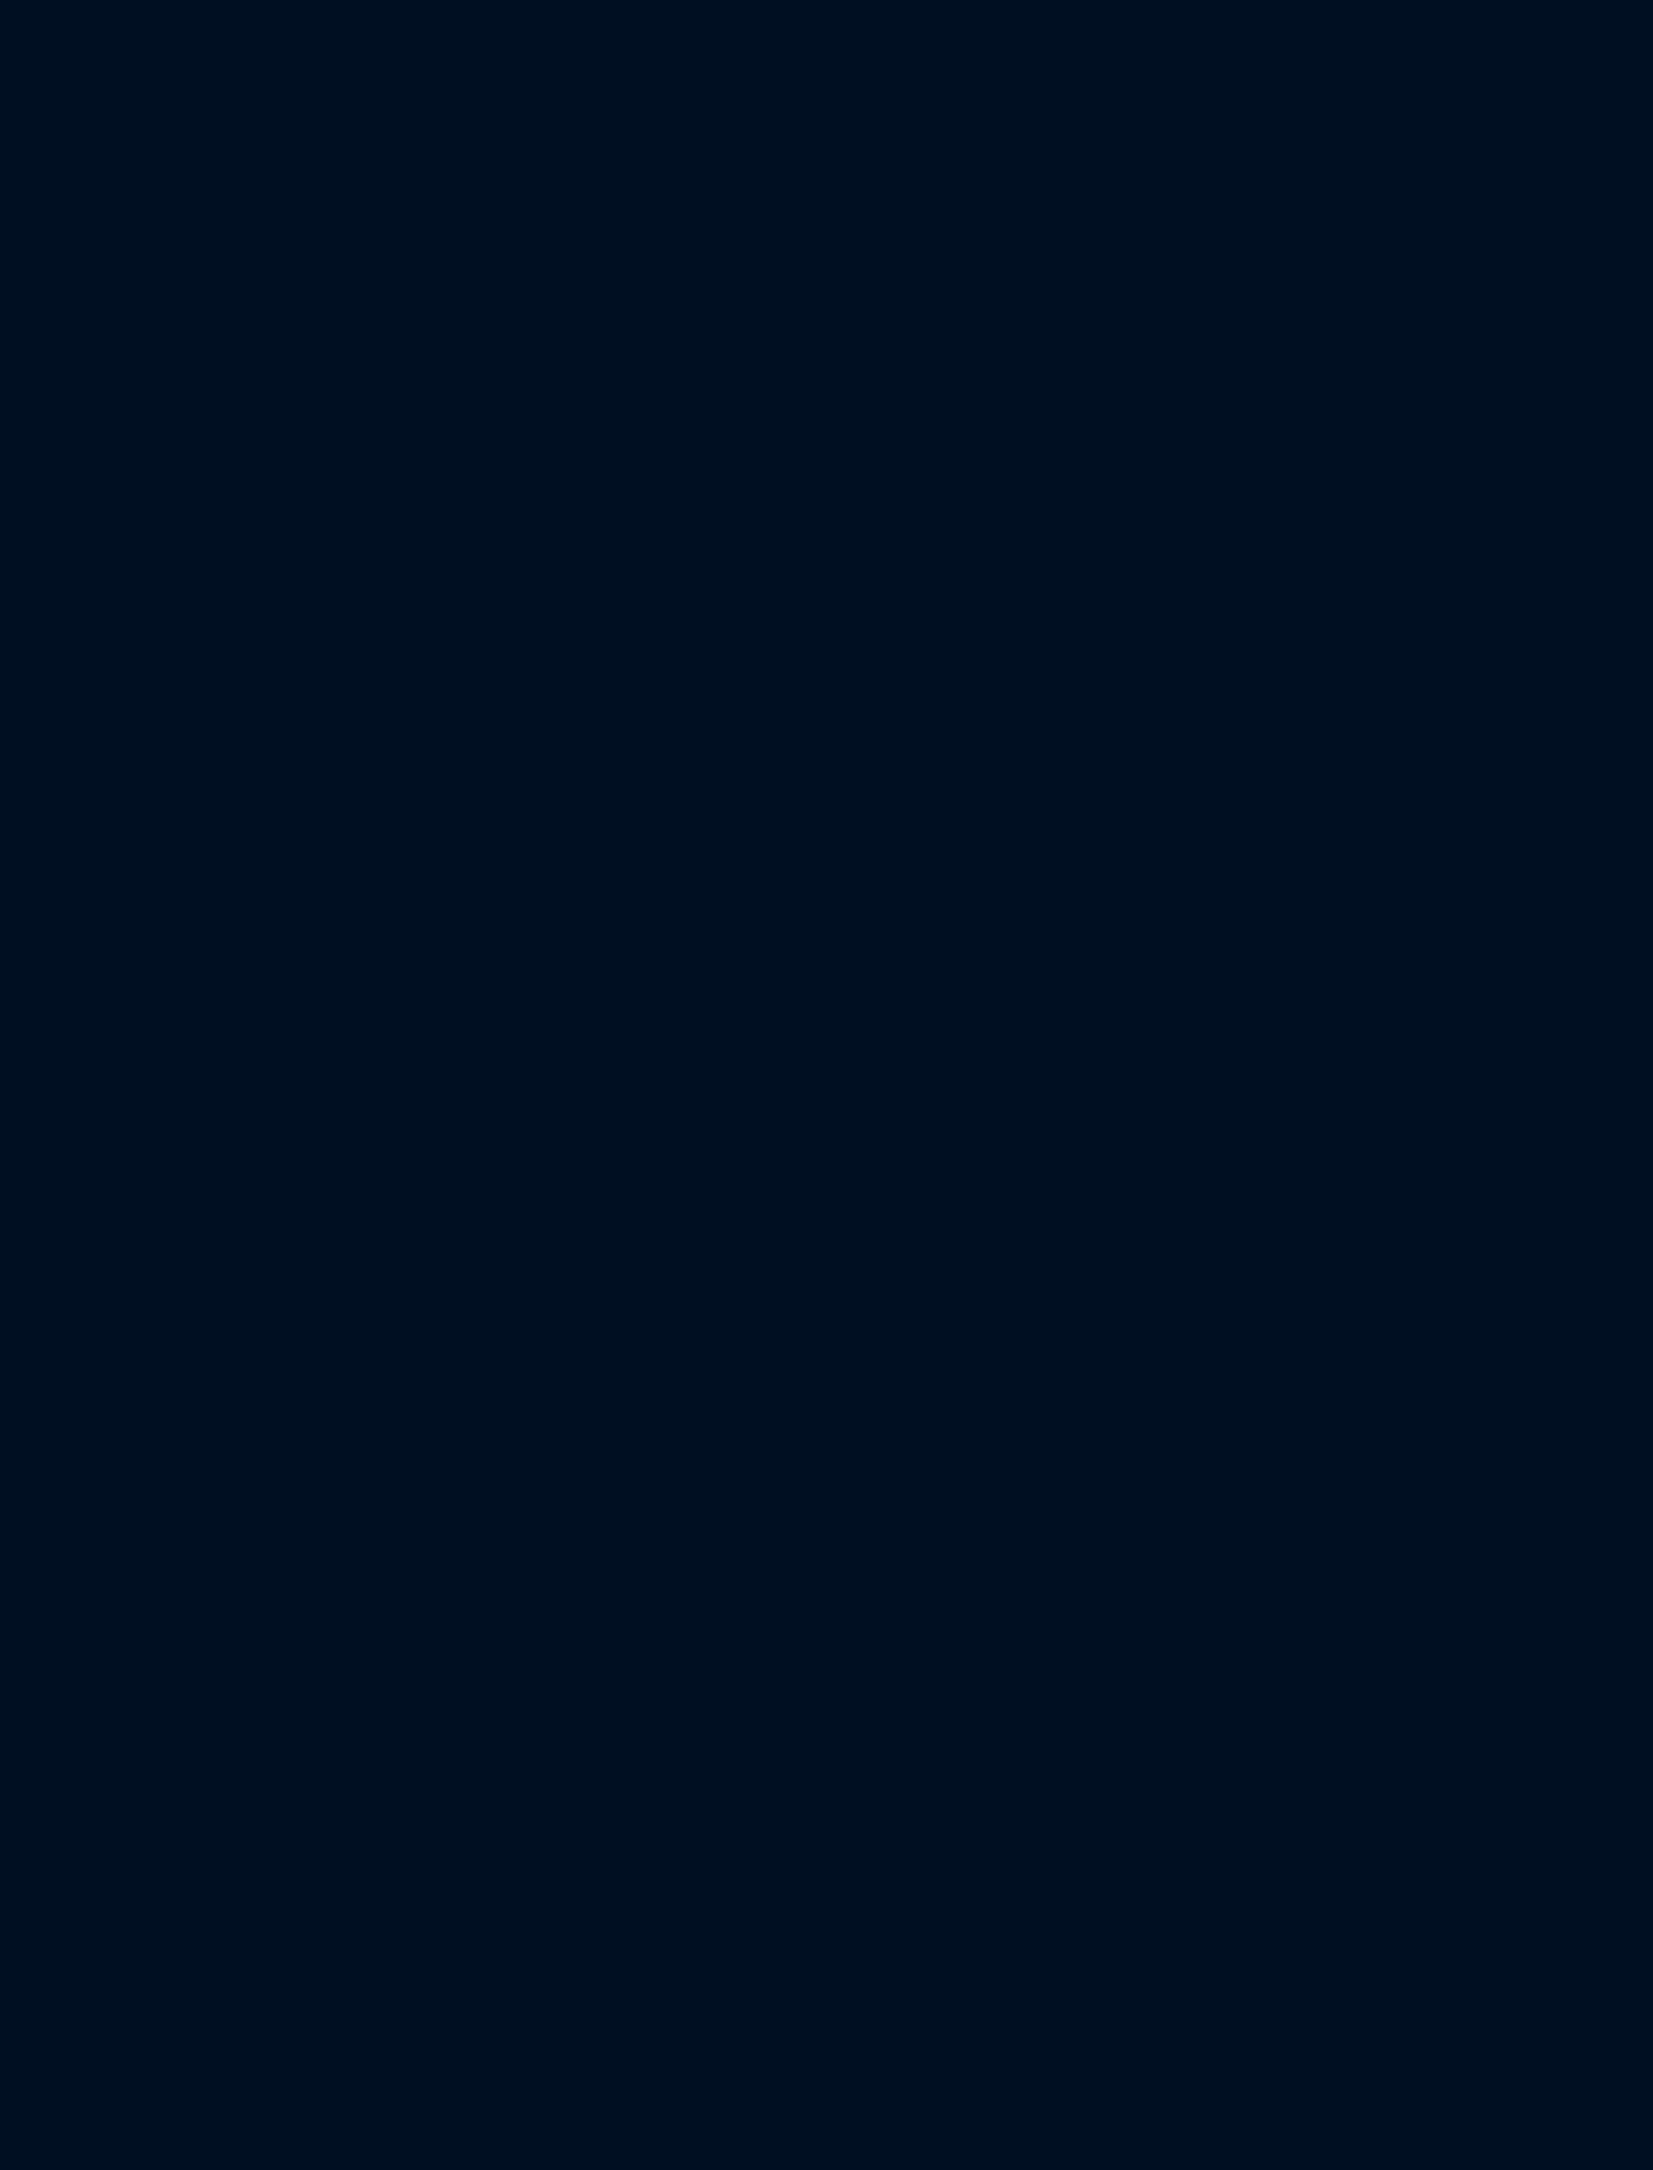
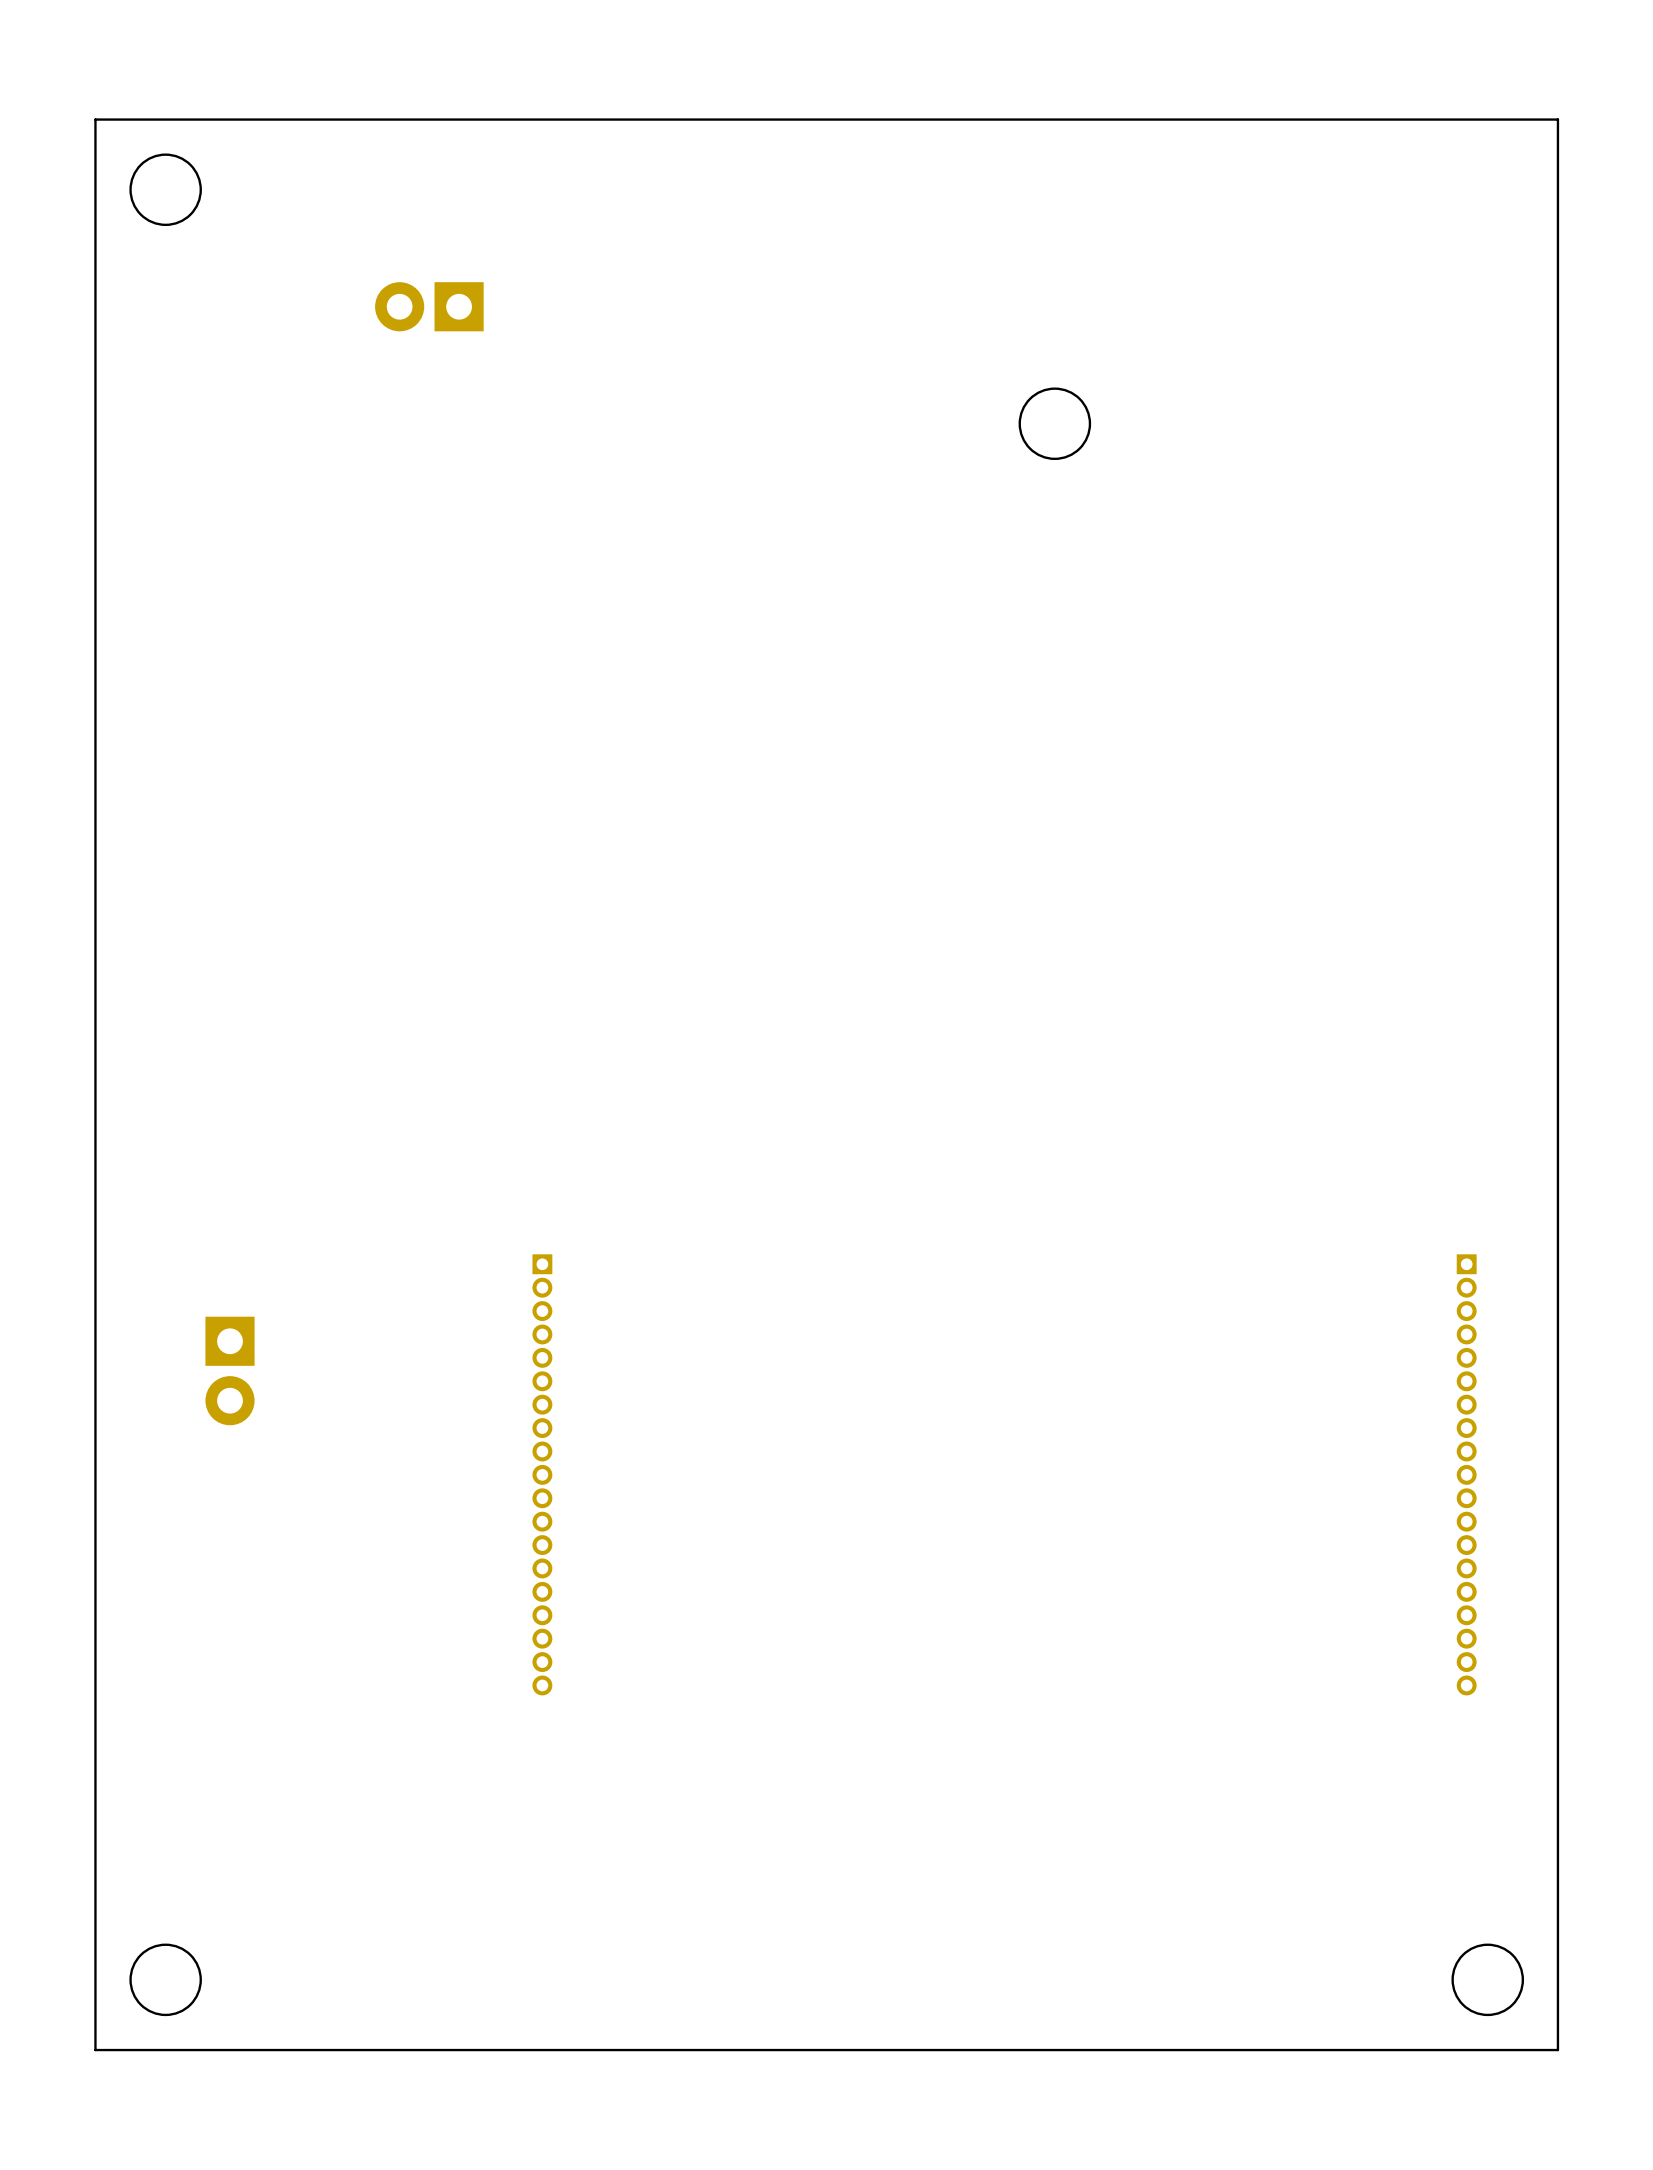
board edge: none -> (1557, 119) (95, 119) (95, 2050) (1557, 2050) (1557, 119)
round board edge: none -> [129, 153, 202, 227]
part: none -> (429, 306)
round board edge: none -> [1018, 387, 1092, 461]
part: none -> (230, 1370)
part: none -> (542, 1474)
part: none -> (1466, 1474)
round board edge: none -> [129, 1943, 202, 2017]
round board edge: none -> [1451, 1943, 1525, 2017]

